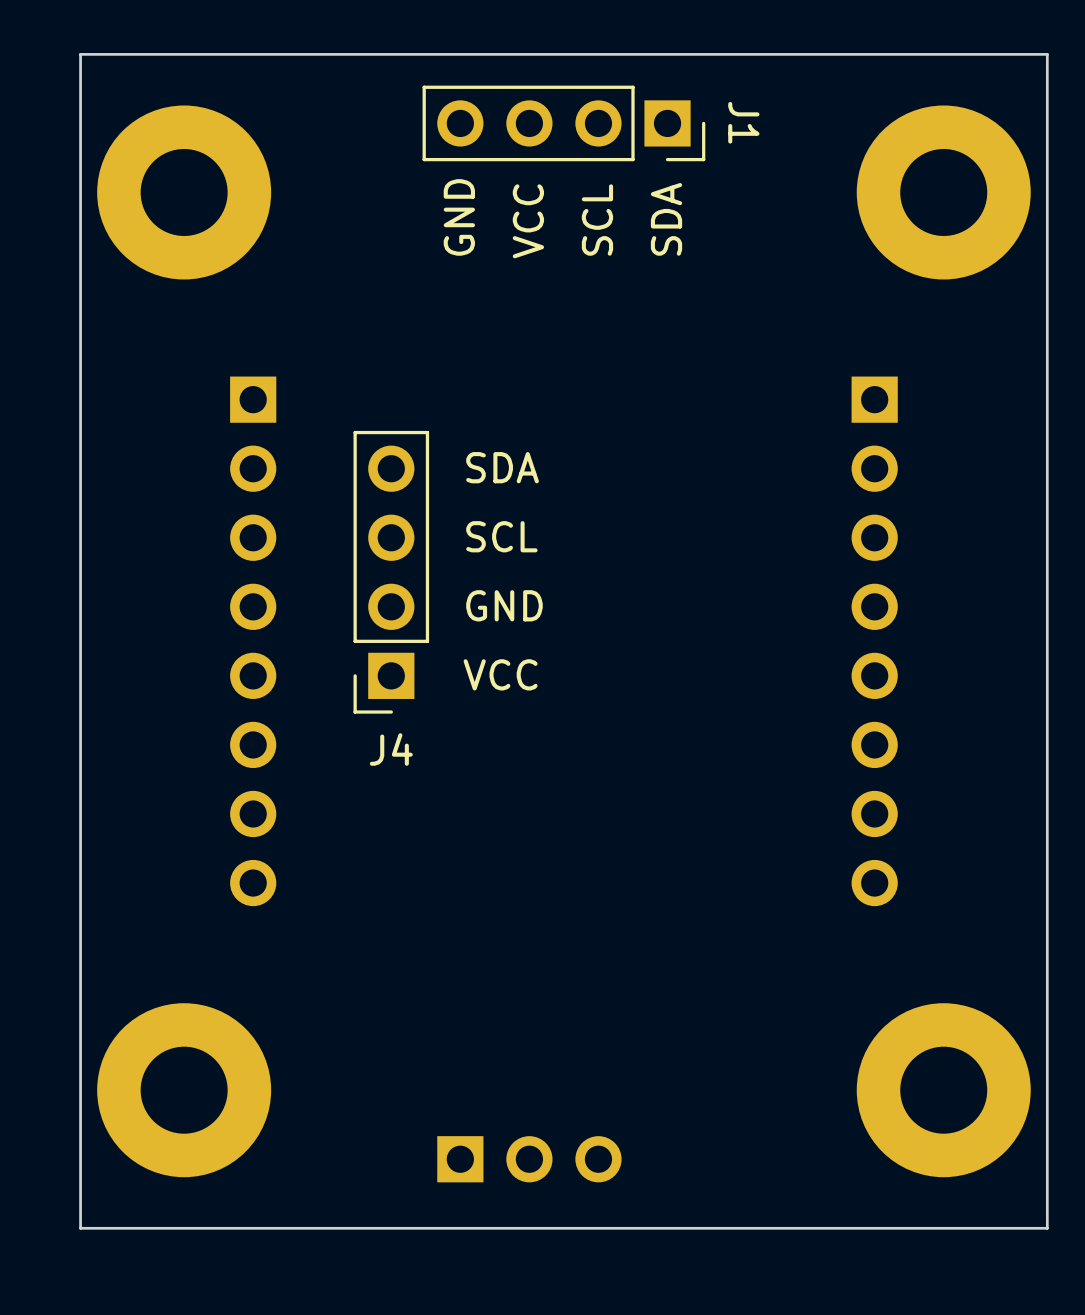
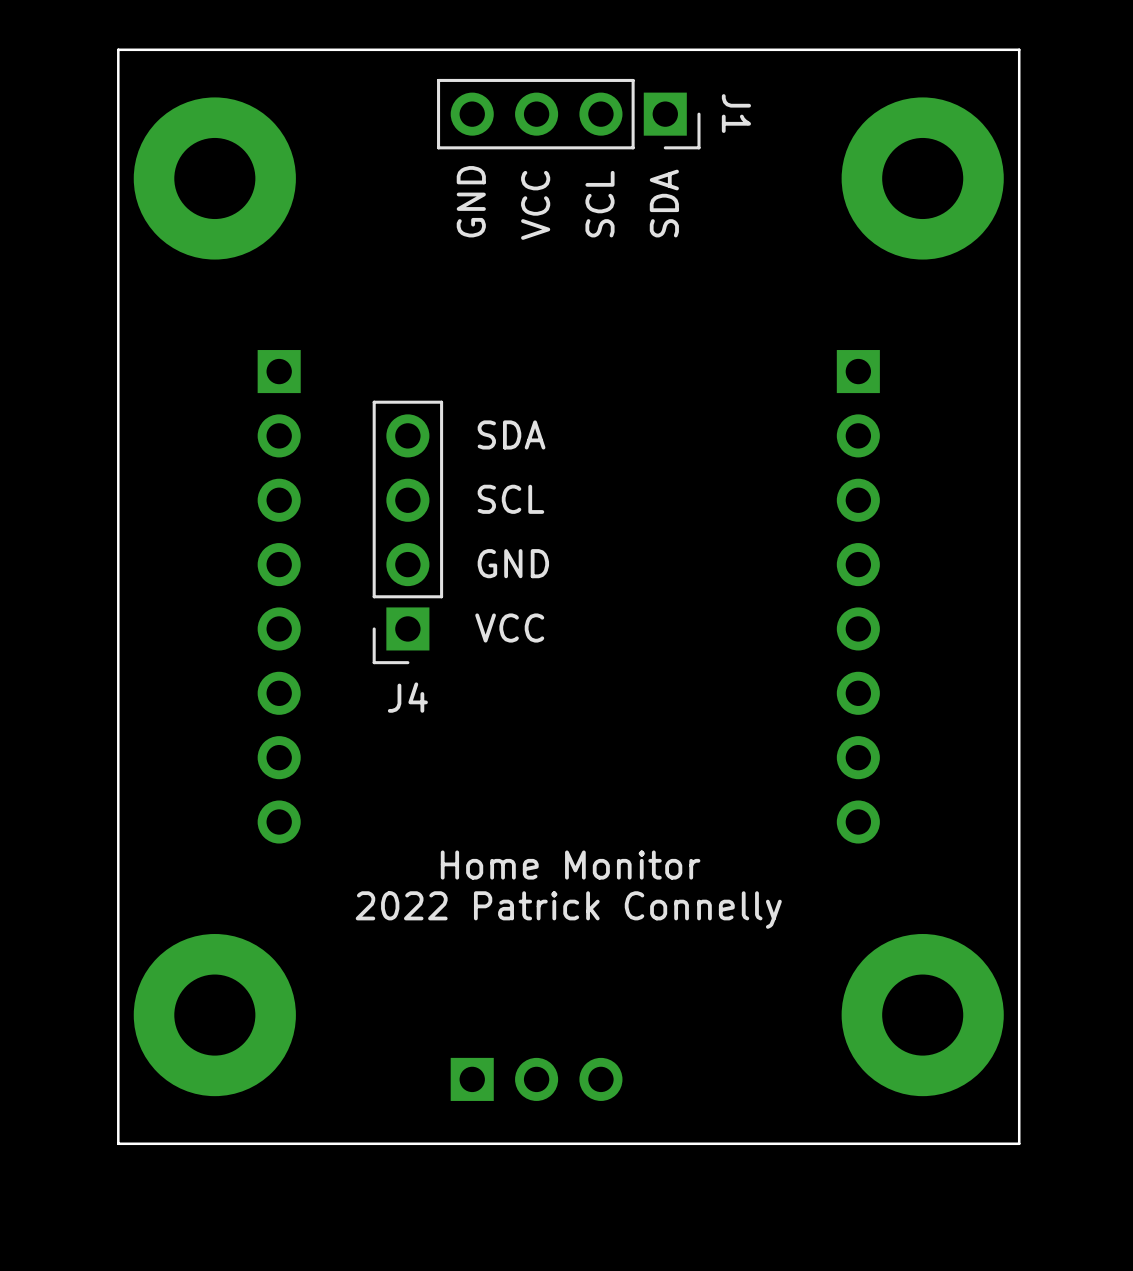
text: none -> Home Monitor (570, 865)
text: none -> 2022 Patrick Connelly (568, 910)

